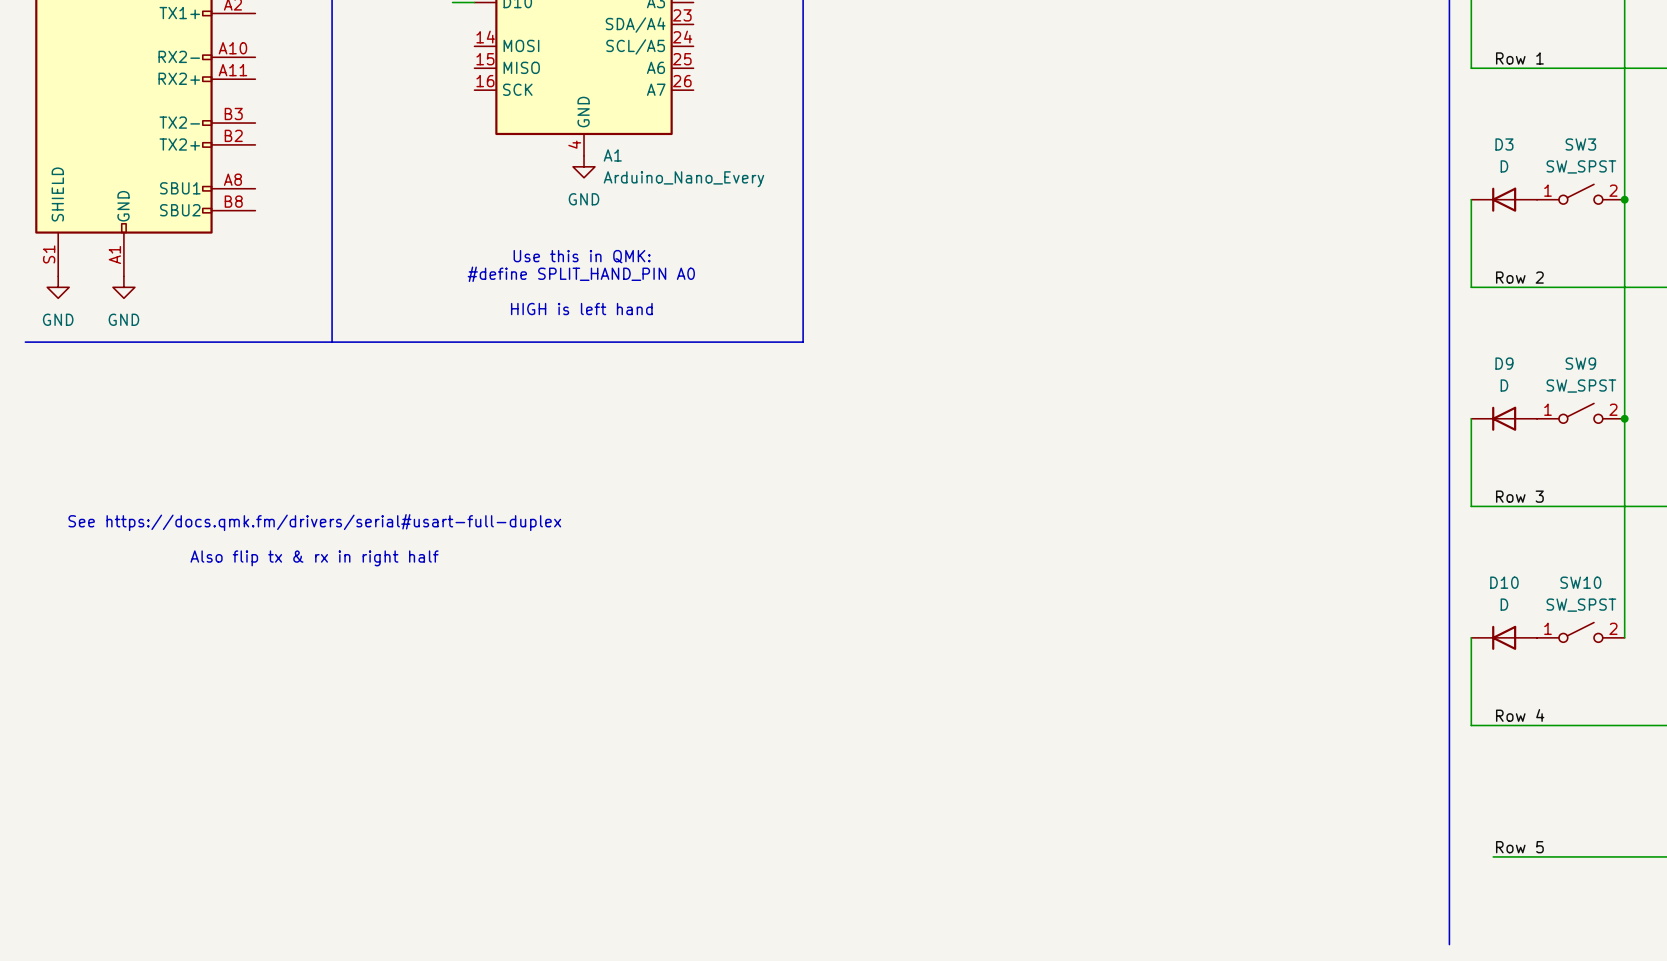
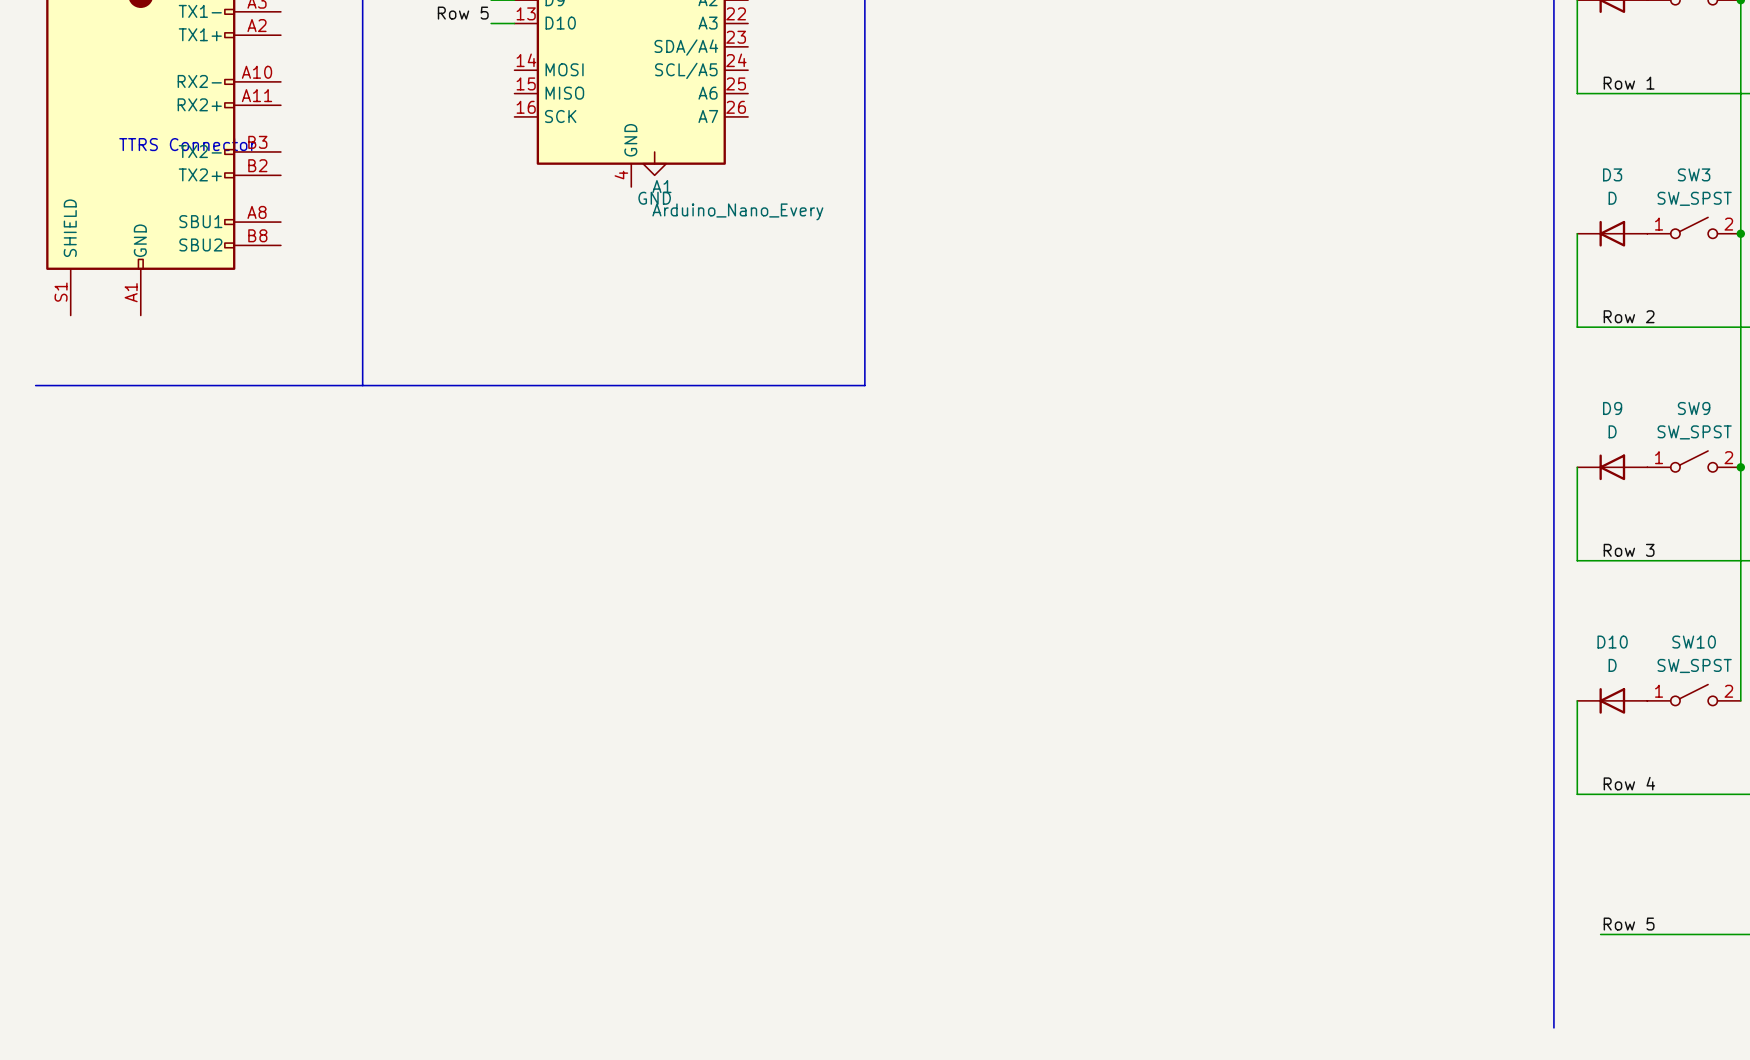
text: none -> TTRS Connector (187, 144)
power symbol position: GND (584, 166) -> GND (654, 163)
text: Use this in QMK: (582, 256) -> none
text: #define SPLIT_HAND_PIN A0 (581, 274) -> none
power symbol: GND (58, 287) -> none
power symbol: GND (123, 287) -> none
text: HIGH is left hand (581, 309) -> none
text: See https://docs.qmk.fm/drivers/serial#usart-full-duplex (314, 522) -> none
text: Also flip tx & rx in right half (314, 558) -> none

